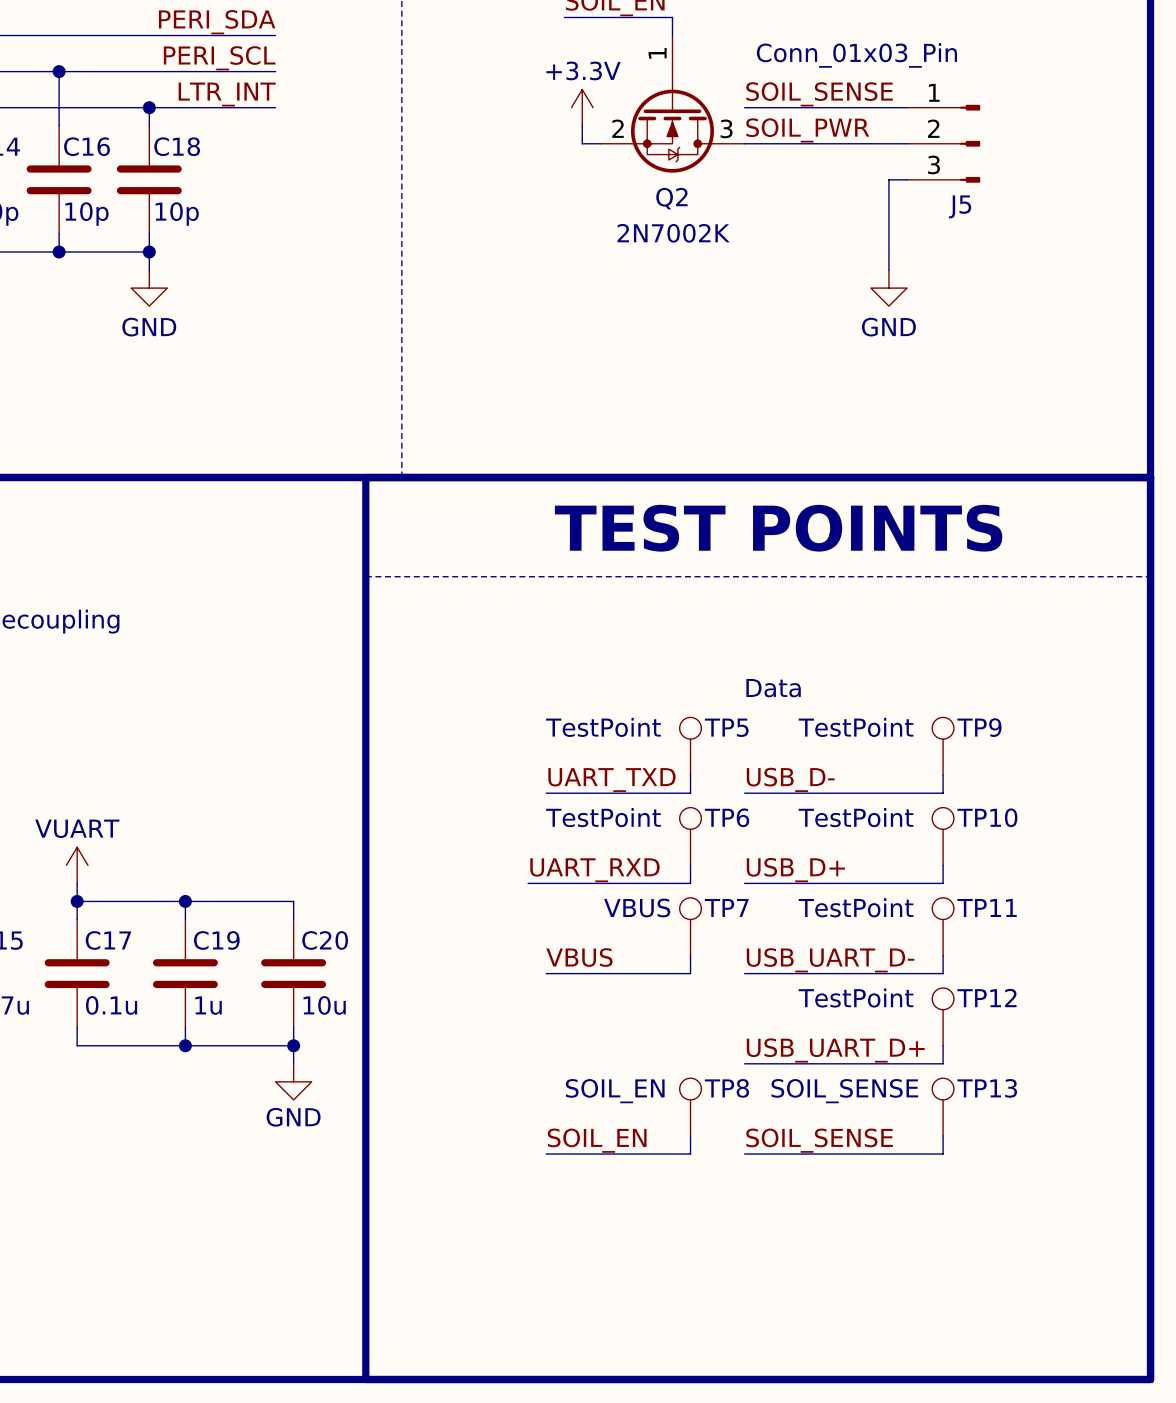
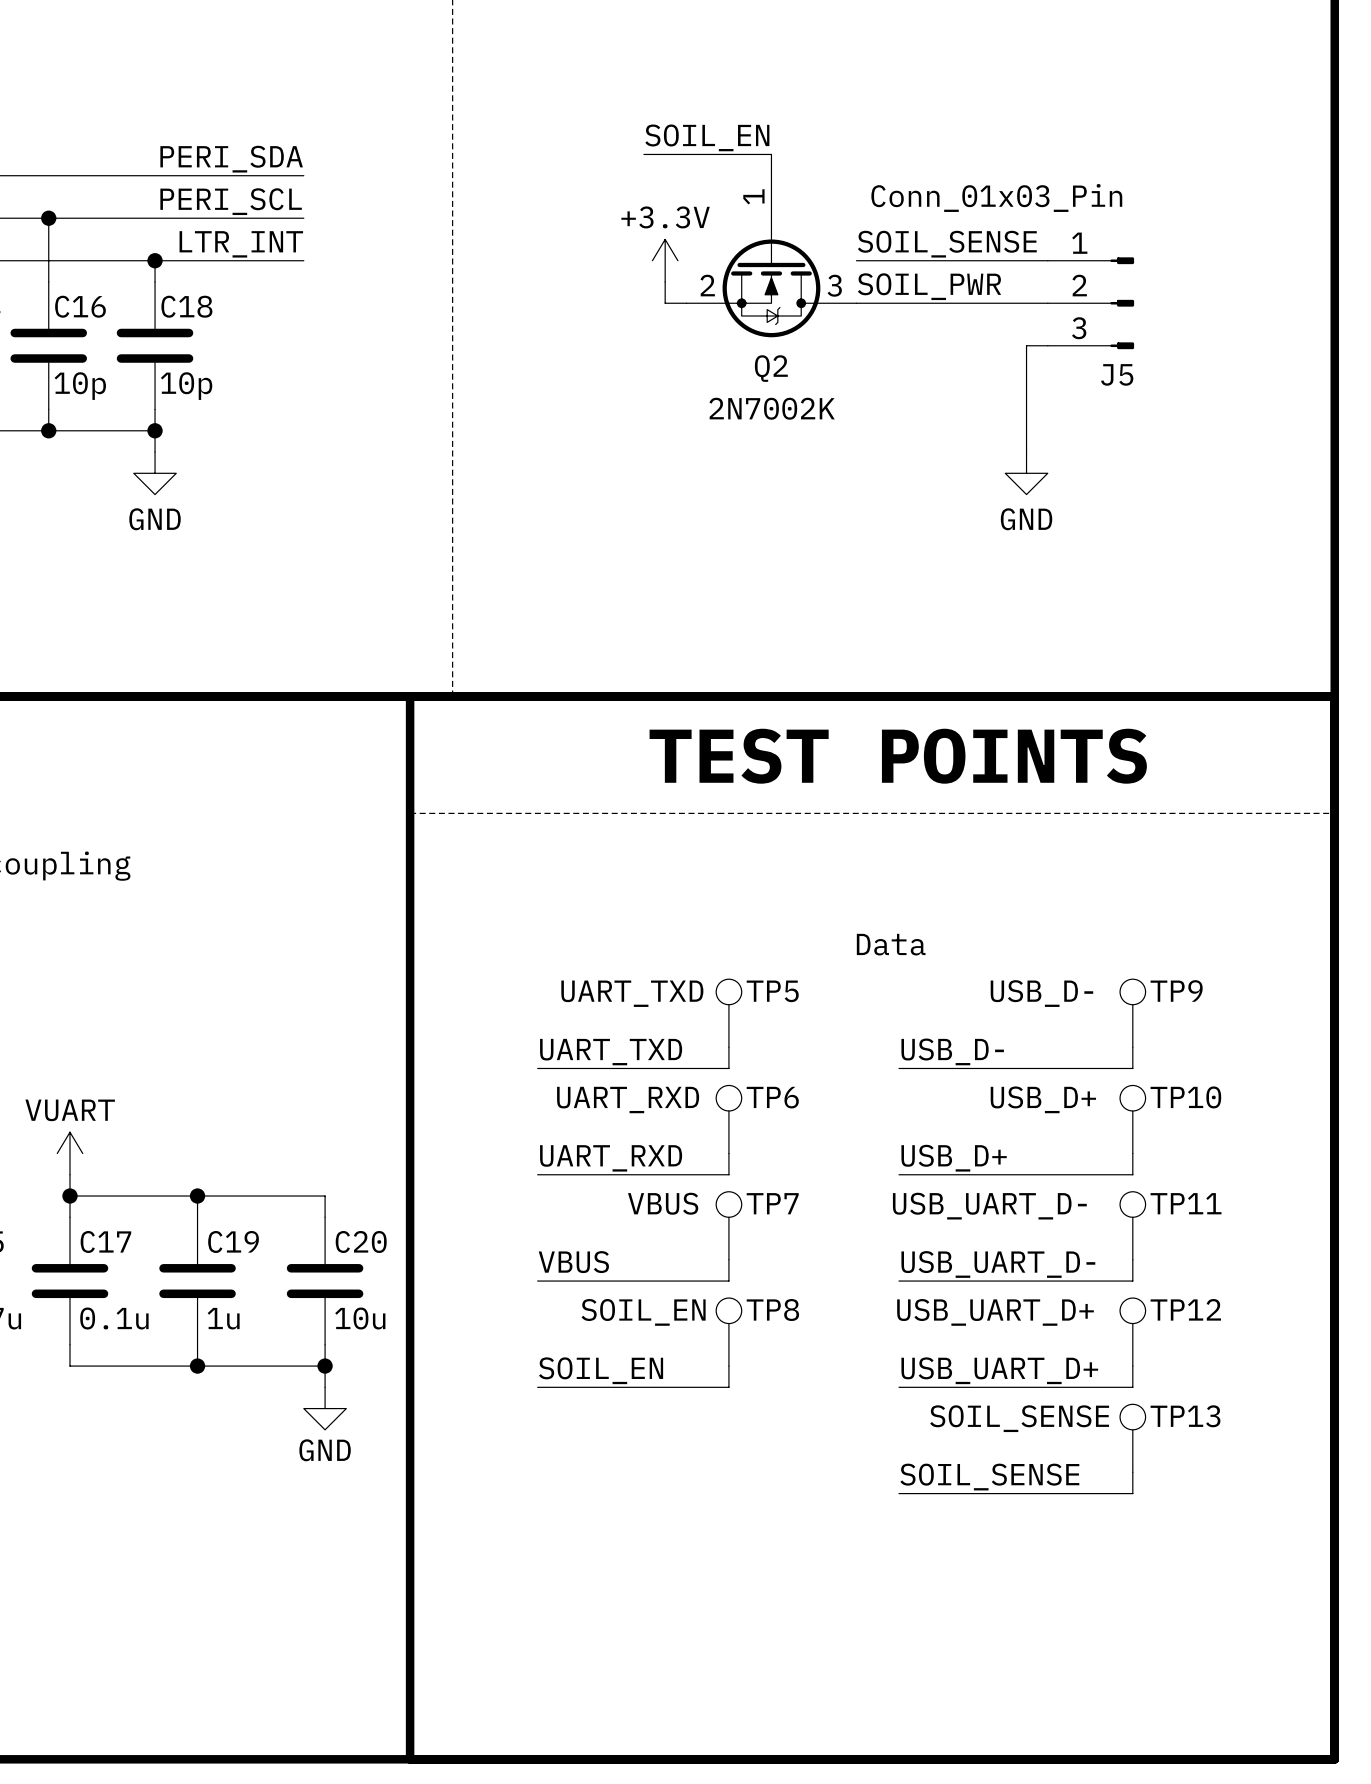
TP5 value: TestPoint (603, 727) -> UART_TXD (632, 993)
TP9 value: TestPoint (856, 727) -> USB_D- (1041, 993)
TP5 position: (690, 746) -> (728, 1013)
TP9 position: (943, 746) -> (1132, 1013)
wire: (690, 775) (690, 793) (636, 793) -> (728, 1047) (728, 1068)
wire: (943, 775) (943, 793) -> (1132, 1047) (1132, 1068) (1090, 1068)
label position: USB_D- (790, 779) -> USB_D- (952, 1051)
label position: UART_TXD (611, 780) -> UART_TXD (611, 1052)
wire: none -> (537, 1068) (622, 1068)
wire: (744, 793) (780, 793) -> none
TP6 value: TestPoint (603, 817) -> UART_RXD (628, 1100)
TP10 value: TestPoint (856, 817) -> USB_D+ (1043, 1099)
TP6 position: (690, 836) -> (728, 1119)
TP10 position: (943, 836) -> (1132, 1119)
wire: (690, 865) (690, 883) (636, 883) -> (728, 1153) (728, 1174)
wire: (943, 865) (943, 883) -> (1132, 1153) (1132, 1174) (1090, 1174)
label position: UART_RXD (594, 870) -> UART_RXD (611, 1158)
label position: USB_D+ (795, 870) -> USB_D+ (954, 1158)
wire: none -> (537, 1174) (601, 1174)
wire: (744, 883) (780, 883) -> none
TP11 value: TestPoint (856, 907) -> USB_UART_D- (989, 1206)
TP7 position: (690, 926) -> (728, 1225)
TP11 position: (943, 926) -> (1132, 1225)
wire: (690, 955) (690, 973) (636, 973) -> (728, 1259) (728, 1281)
wire: (943, 955) (943, 973) -> (1132, 1259) (1132, 1281) (1090, 1281)
label position: VBUS (579, 957) -> VBUS (573, 1262)
label position: USB_UART_D- (830, 960) -> USB_UART_D- (998, 1264)
wire: none -> (537, 1281) (622, 1281)
wire: (744, 973) (780, 973) -> none
TP12 value: TestPoint (856, 997) -> USB_UART_D+ (995, 1312)
TP12 position: (943, 1016) -> (1132, 1332)
wire: none -> (728, 1366) (728, 1387) (537, 1387)
wire: (943, 1045) (943, 1063) -> (1132, 1366) (1132, 1387) (1090, 1387)
label position: USB_UART_D+ (835, 1050) -> USB_UART_D+ (999, 1370)
wire: (744, 1063) (780, 1063) -> none
TP8 position: (690, 1107) -> (728, 1332)
TP13 position: (943, 1107) -> (1132, 1438)
wire: (690, 1135) (690, 1154) (546, 1154) -> none
wire: (943, 1135) (943, 1154) -> (1132, 1472) (1132, 1493) (1090, 1493)
label position: SOIL_EN (597, 1140) -> SOIL_EN (601, 1370)
label position: SOIL_SENSE (819, 1140) -> SOIL_SENSE (989, 1477)
wire: (744, 1154) (780, 1154) -> none

